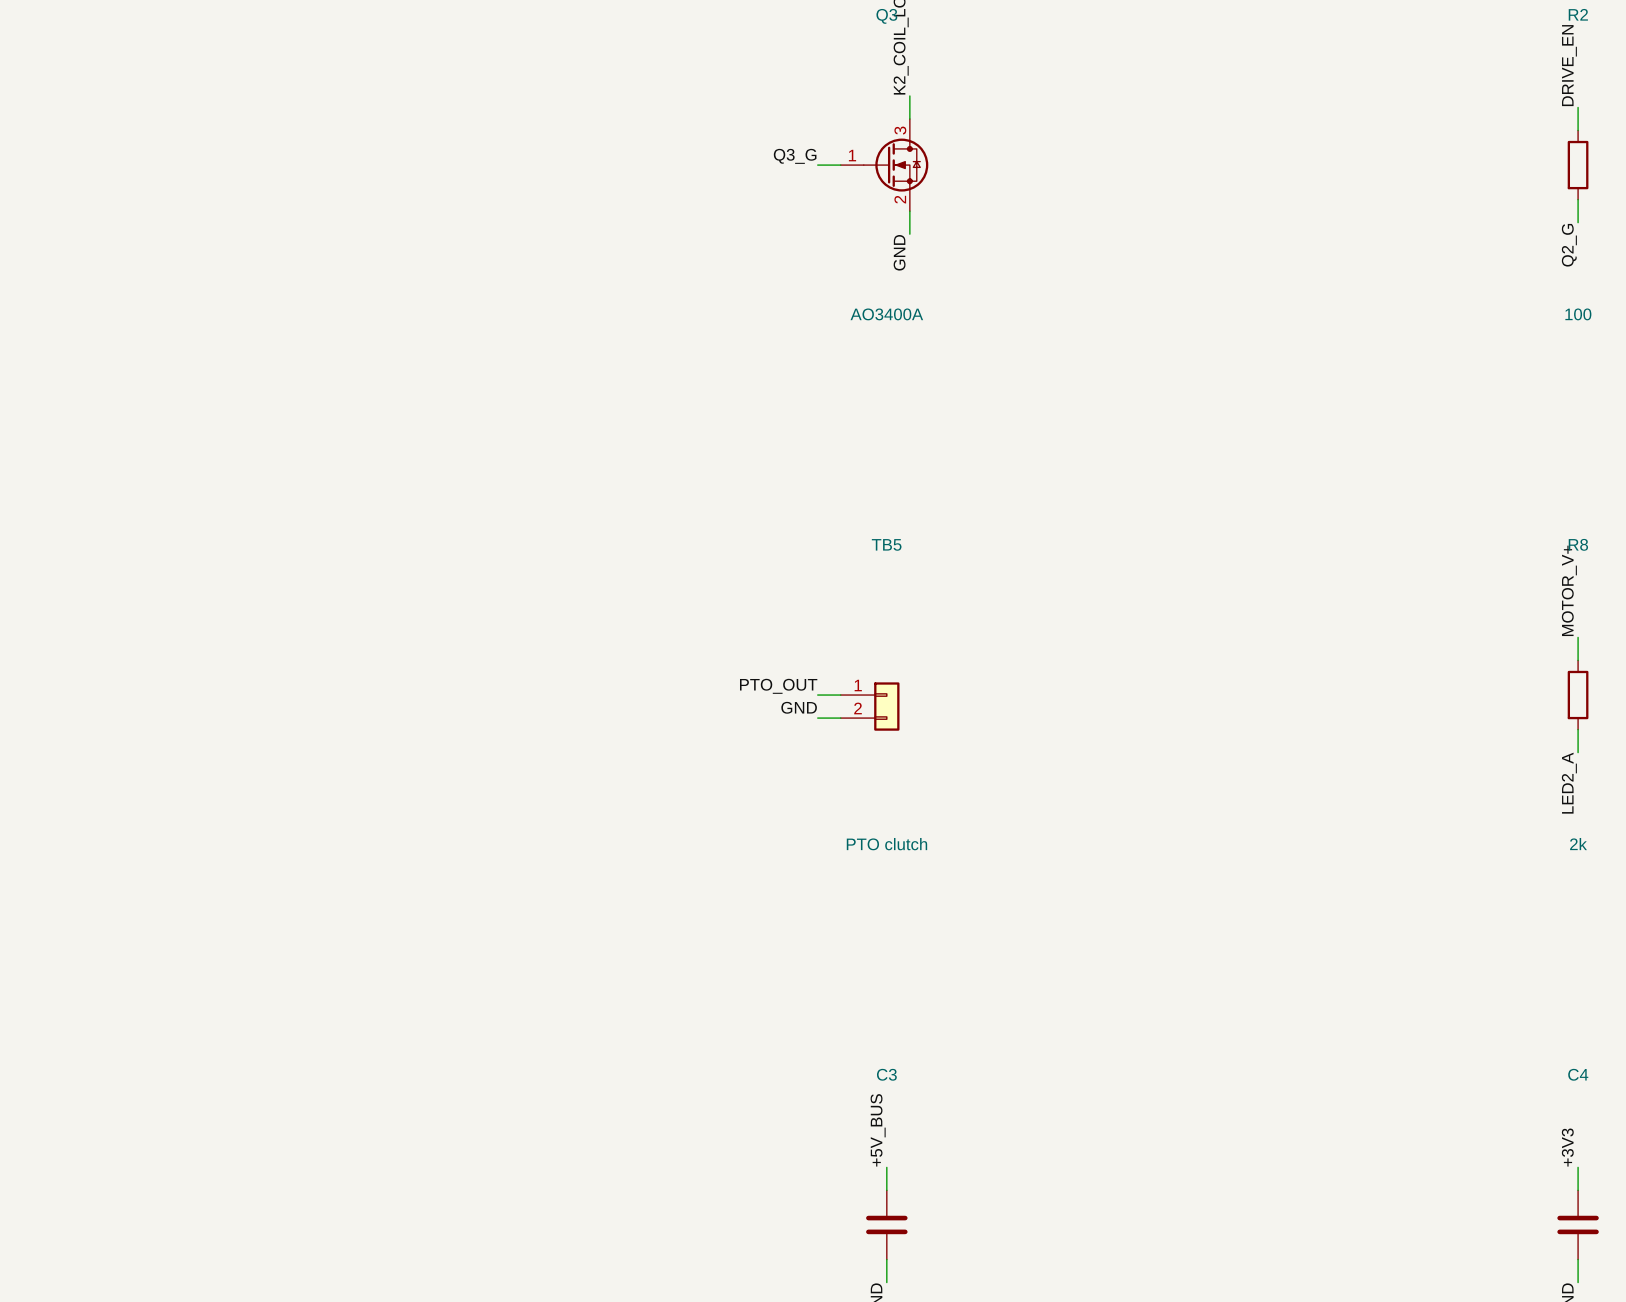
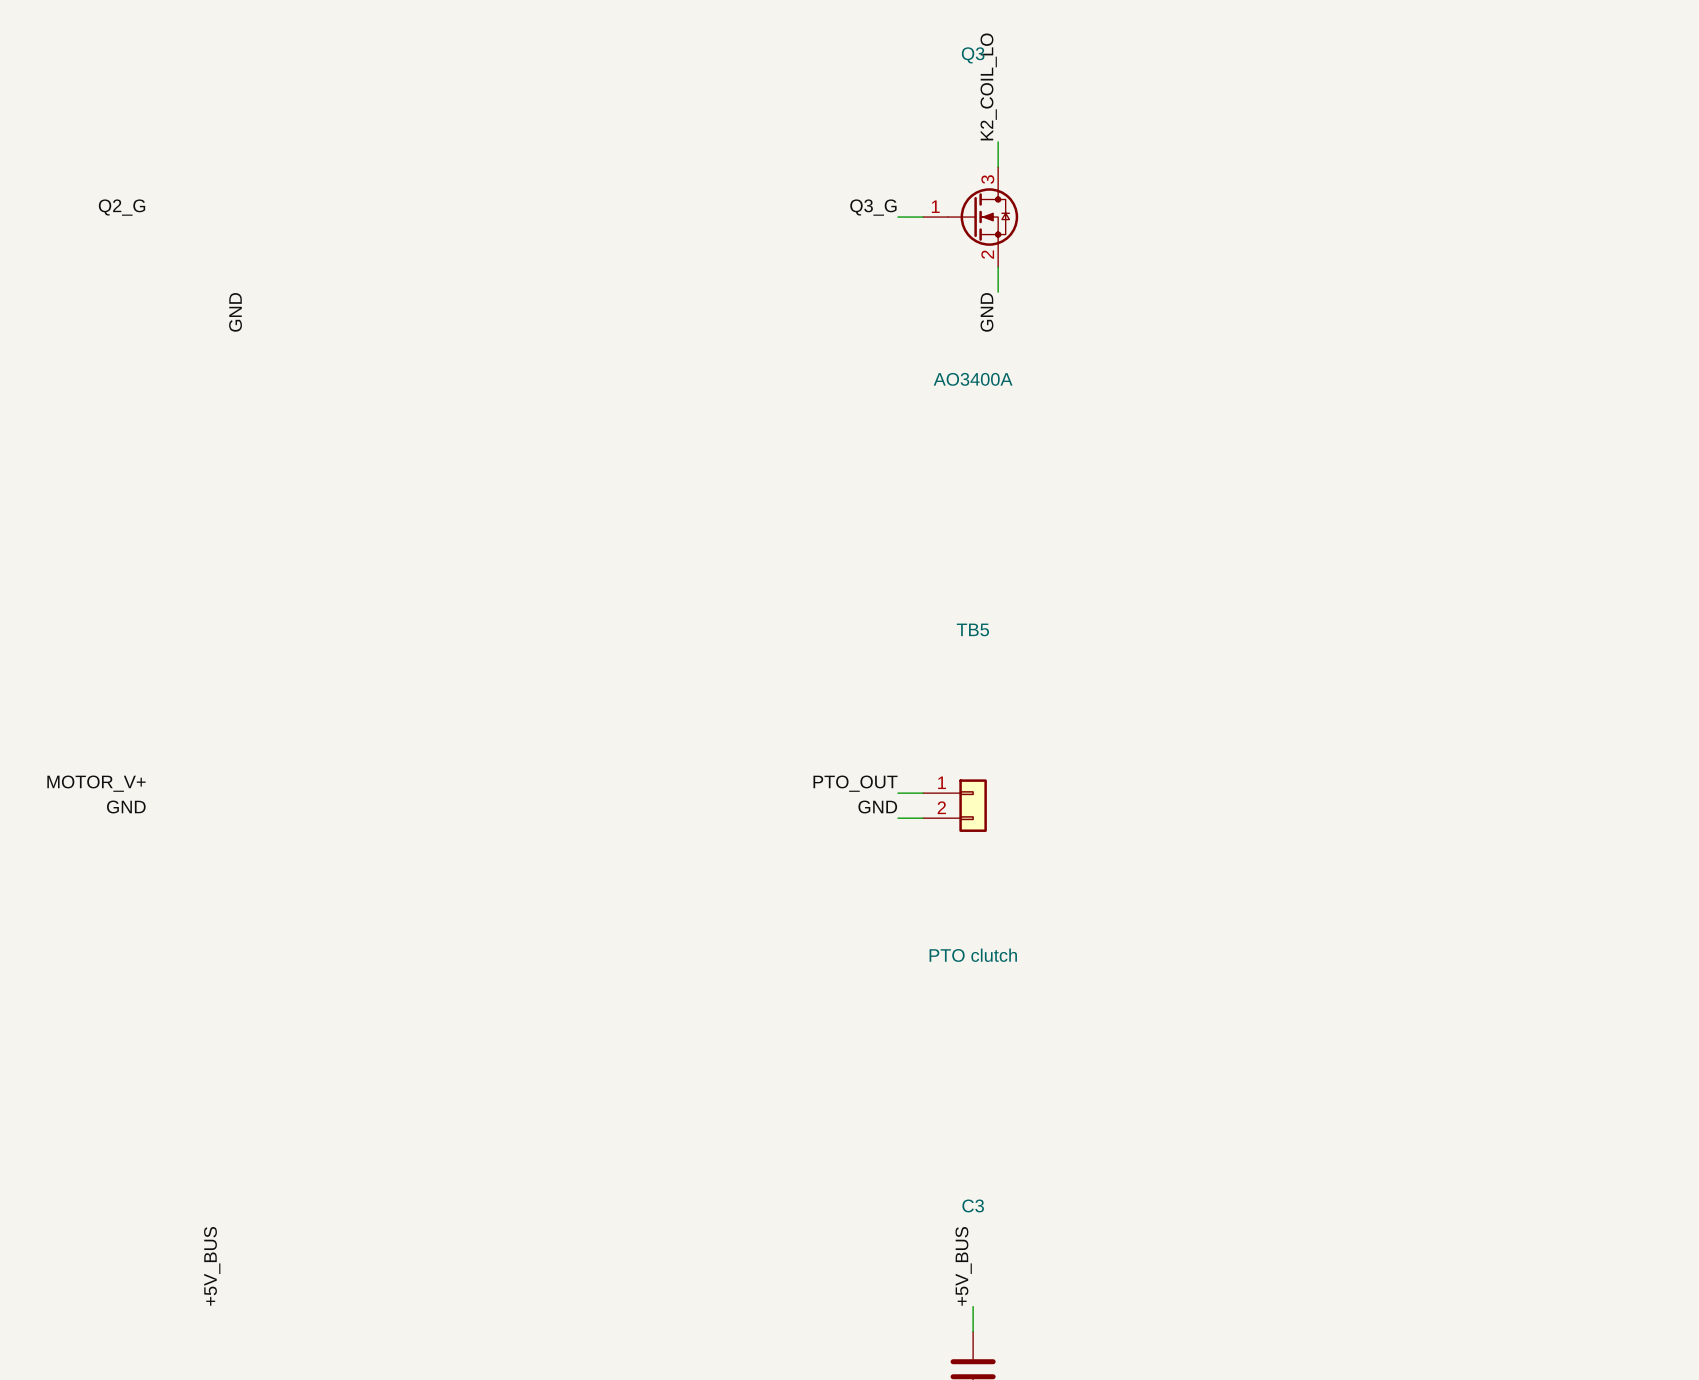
label: none -> Q2_G (121, 207)
label: none -> GND (235, 312)
label: none -> MOTOR_V+ (96, 783)
label: none -> GND (126, 807)
label: none -> +5V_BUS (212, 1266)

